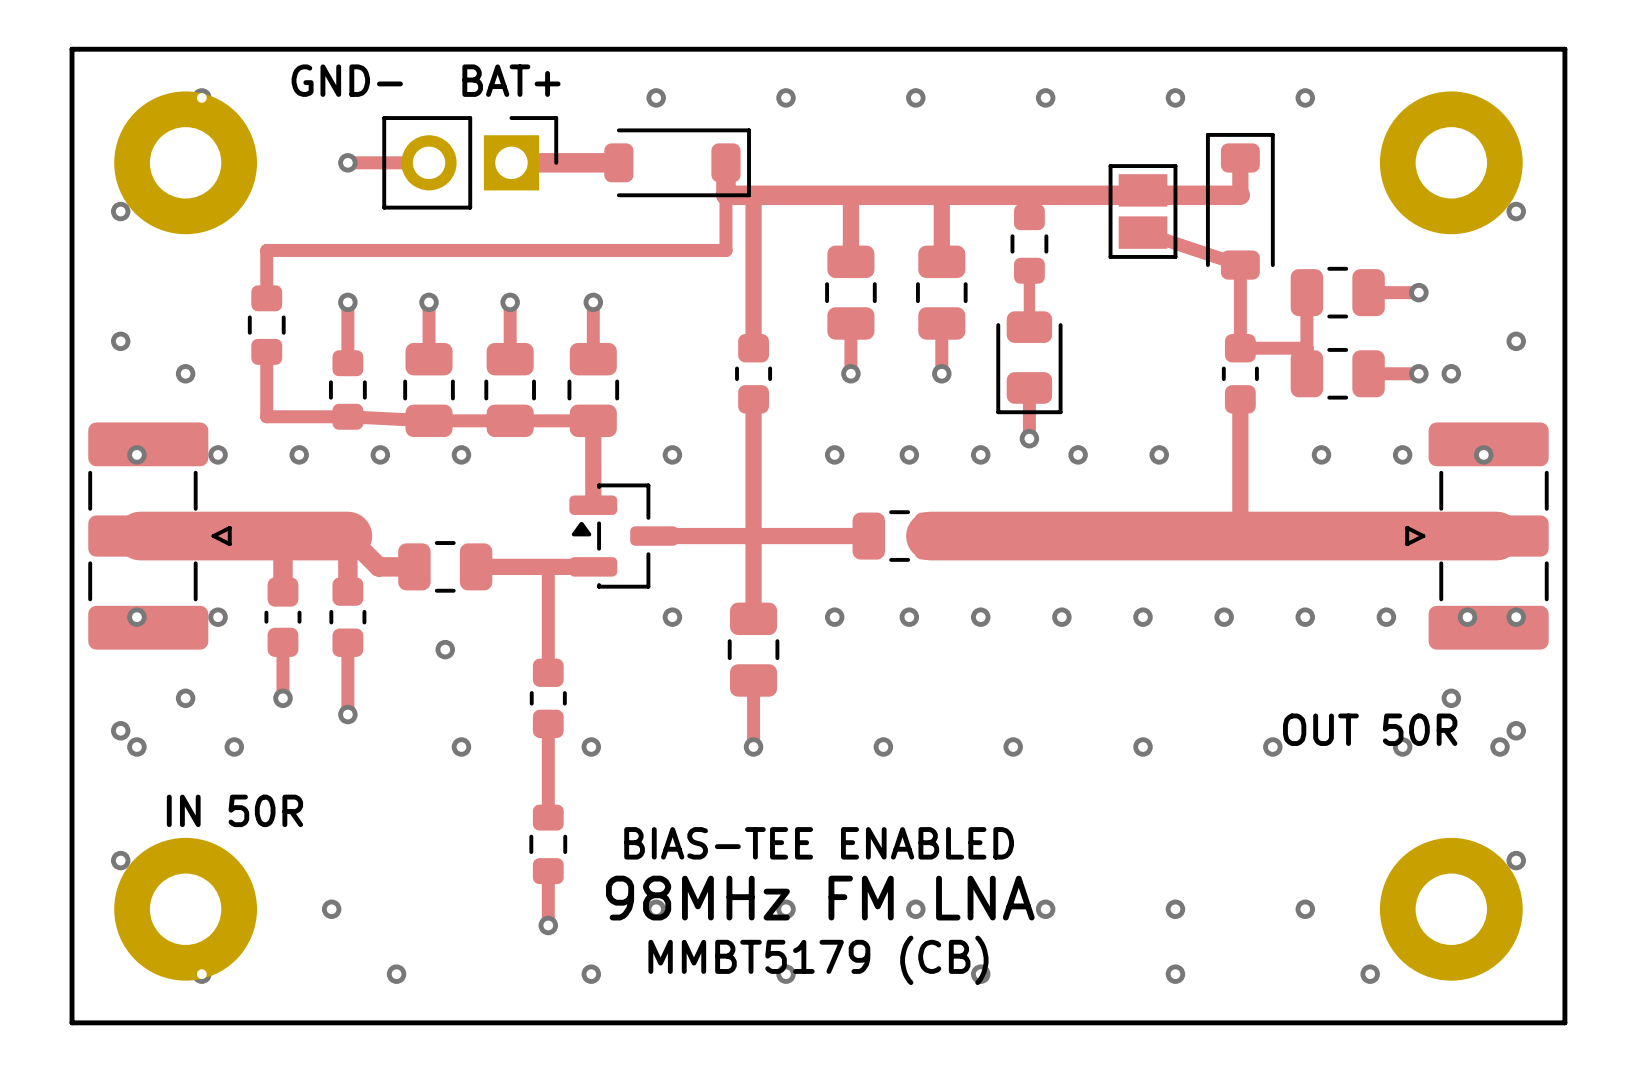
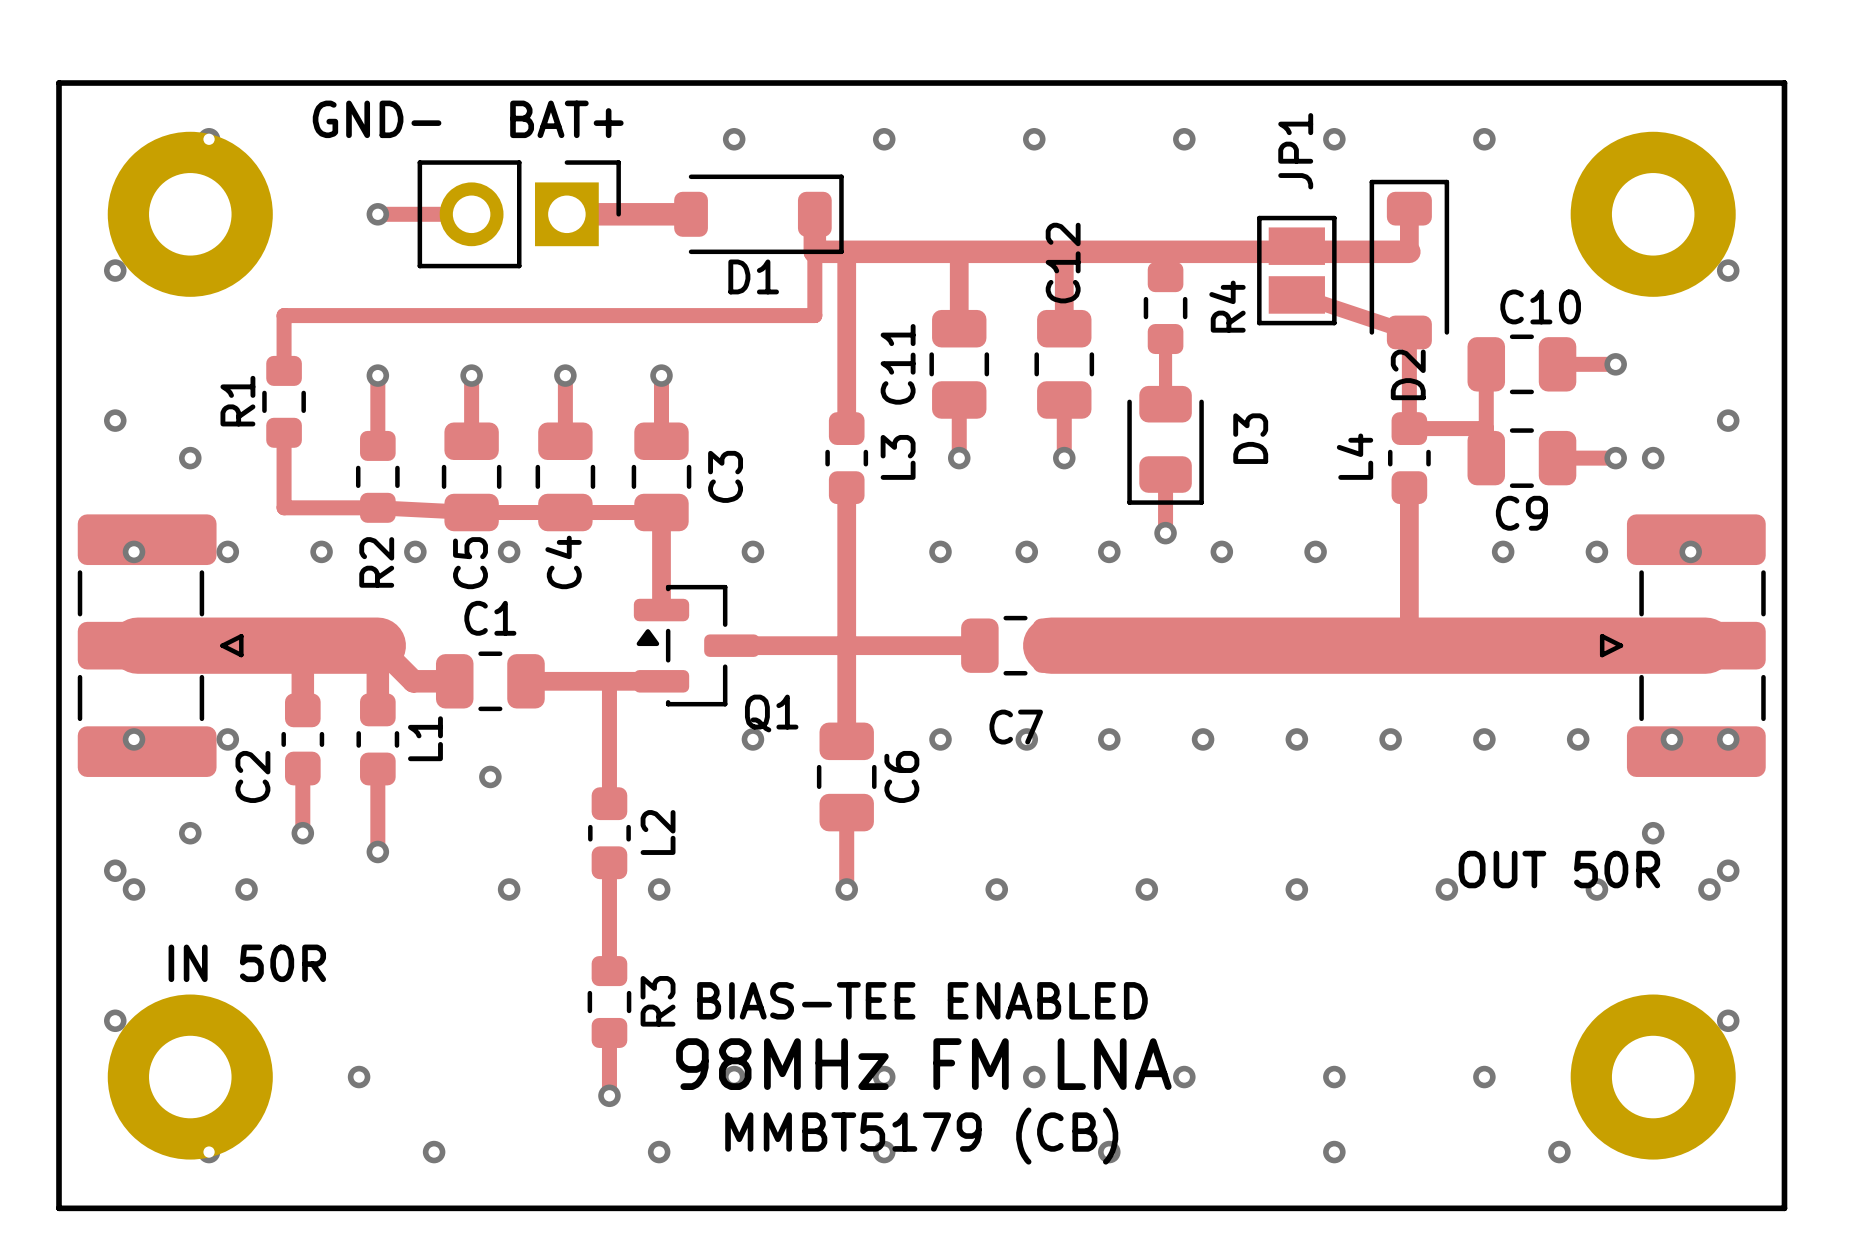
JP1 name: none -> JP1 (1295, 151)
C12 name: none -> C12 (1063, 263)
D1 name: none -> D1 (753, 276)
R4 name: none -> R4 (1227, 306)
C10 name: none -> C10 (1540, 306)
C11 name: none -> C11 (898, 364)
D2 name: none -> D2 (1408, 374)
R1 name: none -> R1 (237, 401)
D3 name: none -> D3 (1250, 438)
L4 name: none -> L4 (1355, 456)
L3 name: none -> L3 (898, 457)
C3 name: none -> C3 (725, 476)
C9 name: none -> C9 (1521, 513)
R2 name: none -> R2 (376, 562)
C5 name: none -> C5 (470, 563)
C4 name: none -> C4 (563, 562)
C1 name: none -> C1 (490, 618)
Q1 name: none -> Q1 (771, 713)
C7 name: none -> C7 (1016, 727)
L1 name: none -> L1 (425, 738)
C2 name: none -> C2 (252, 776)
C6 name: none -> C6 (901, 776)
L2 name: none -> L2 (658, 832)
R3 name: none -> R3 (658, 1001)

